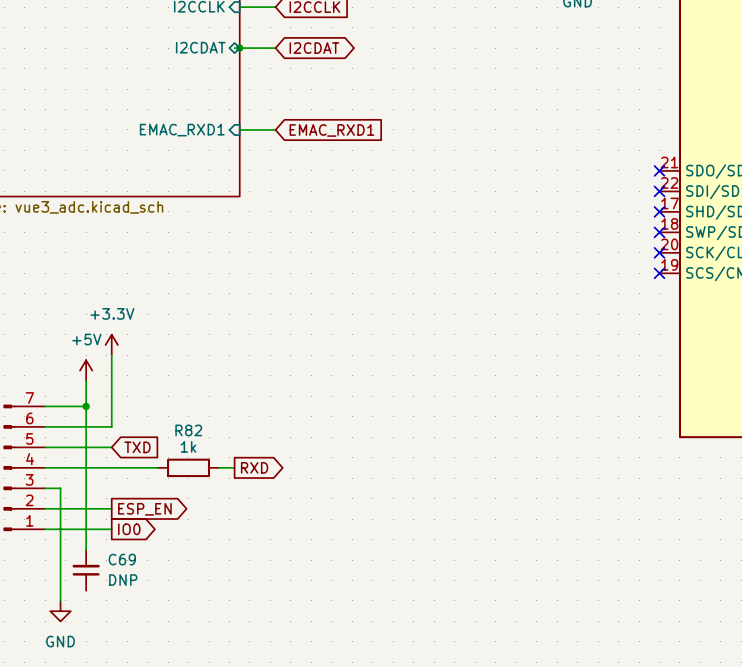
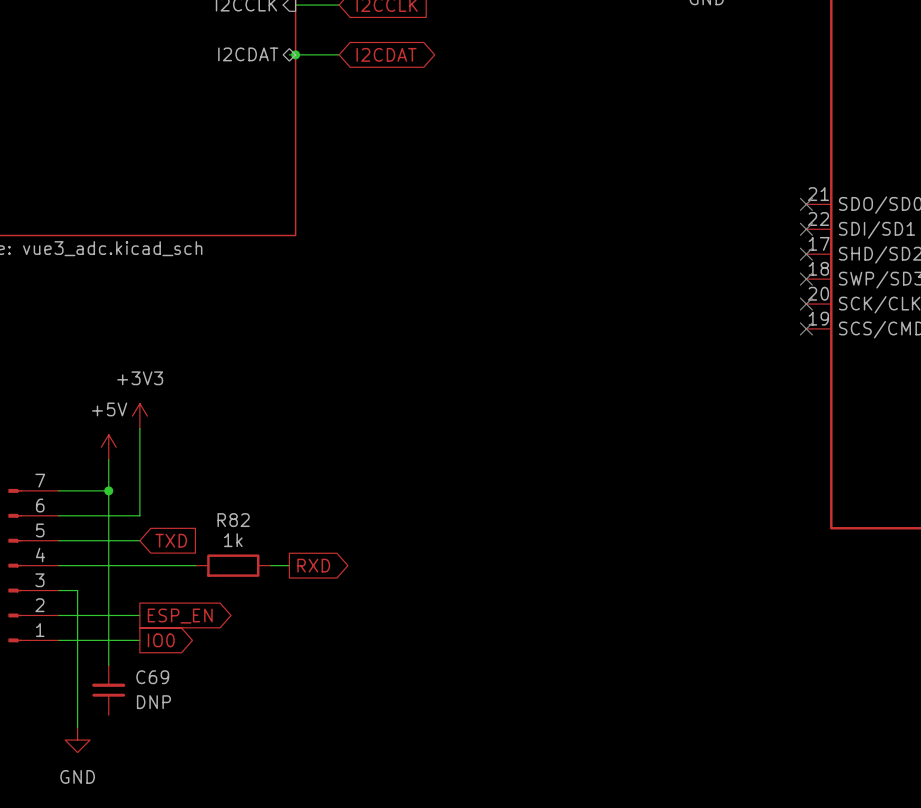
wire: (239, 129) (275, 129) -> none
sheet pin: EMAC_RXD1 (182, 130) -> none
global label: EMAC_RXD1 (332, 130) -> none
power symbol: +3.3V (111, 345) -> +3V3 (139, 416)

